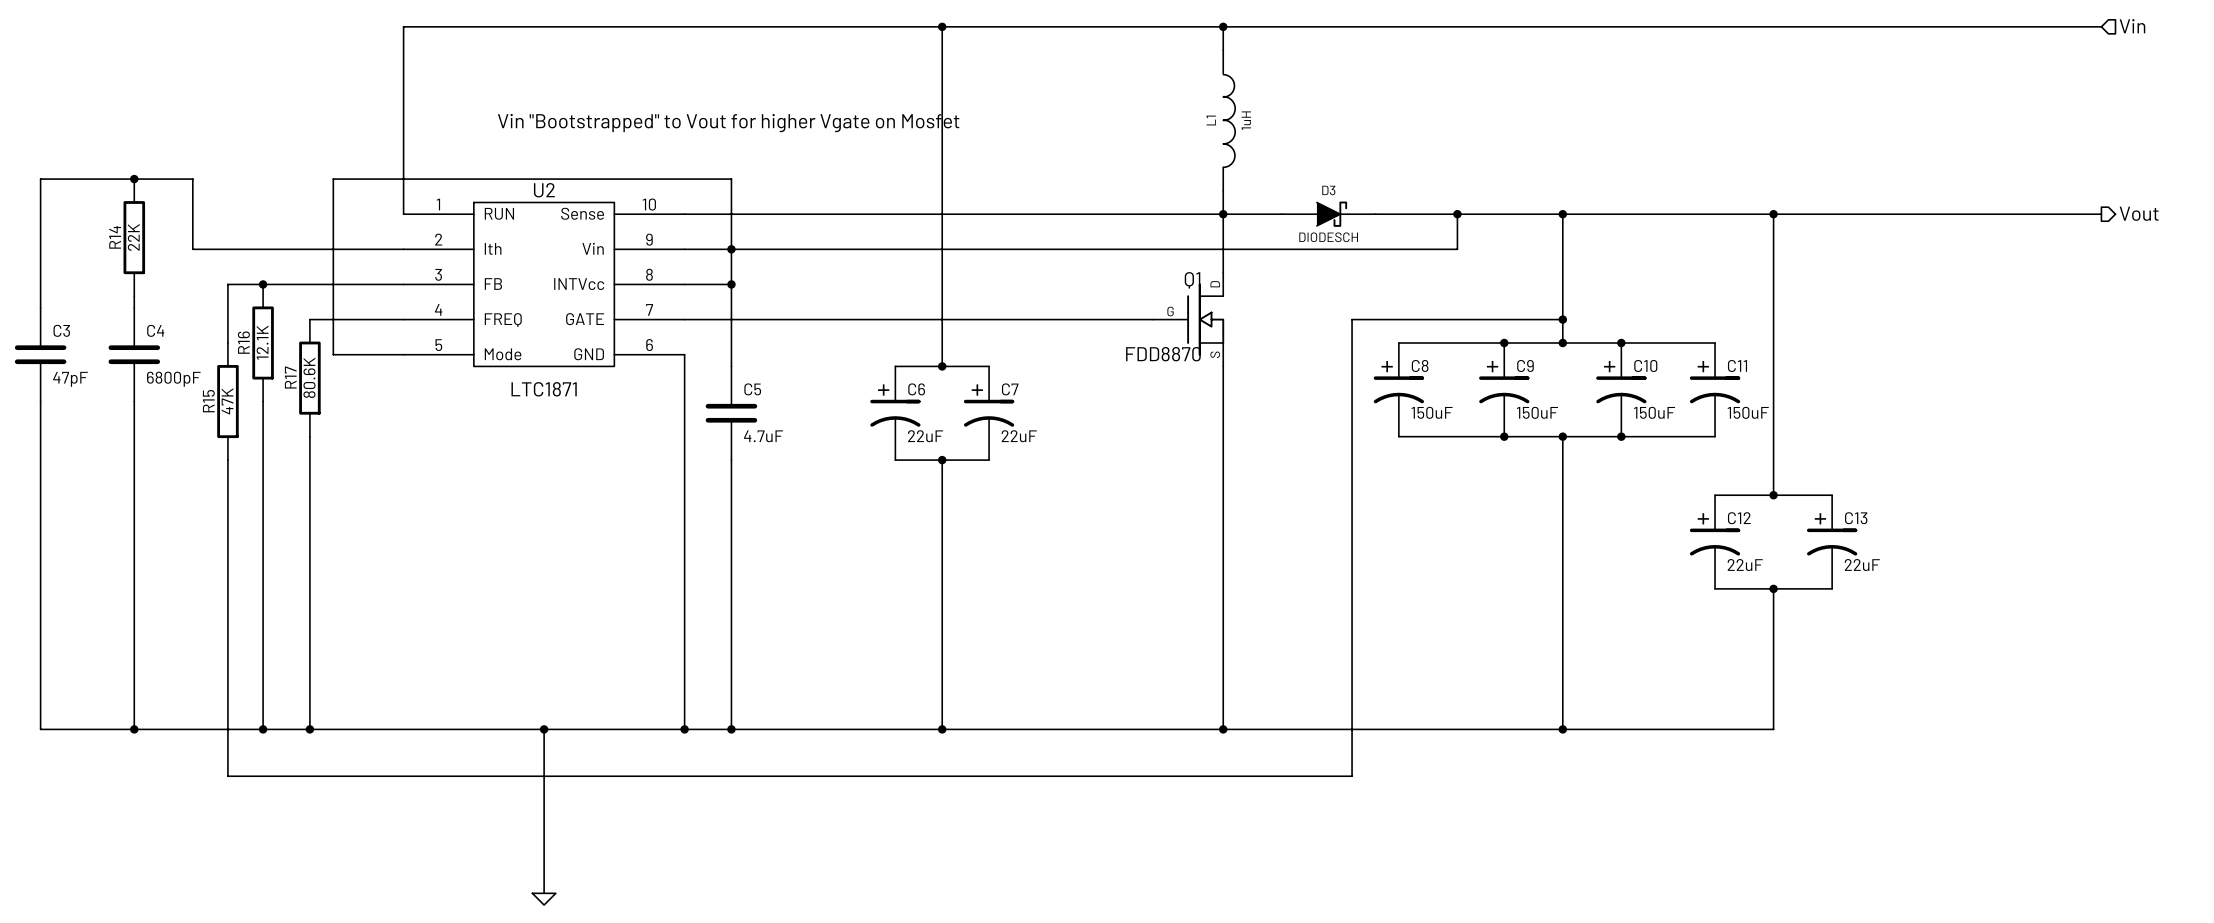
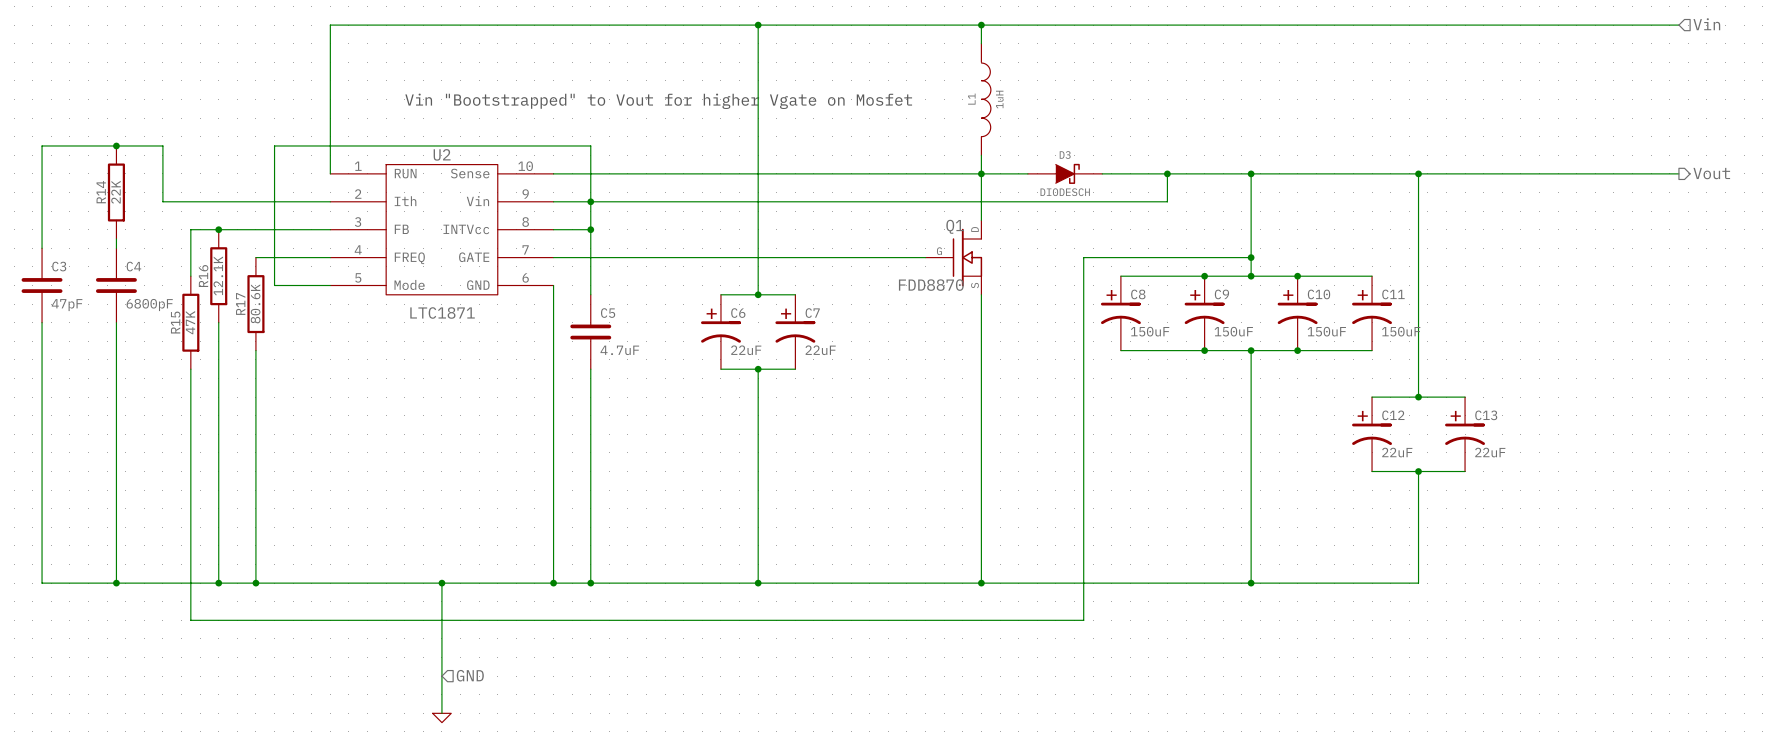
hierarchical label: none -> GND (470, 675)

